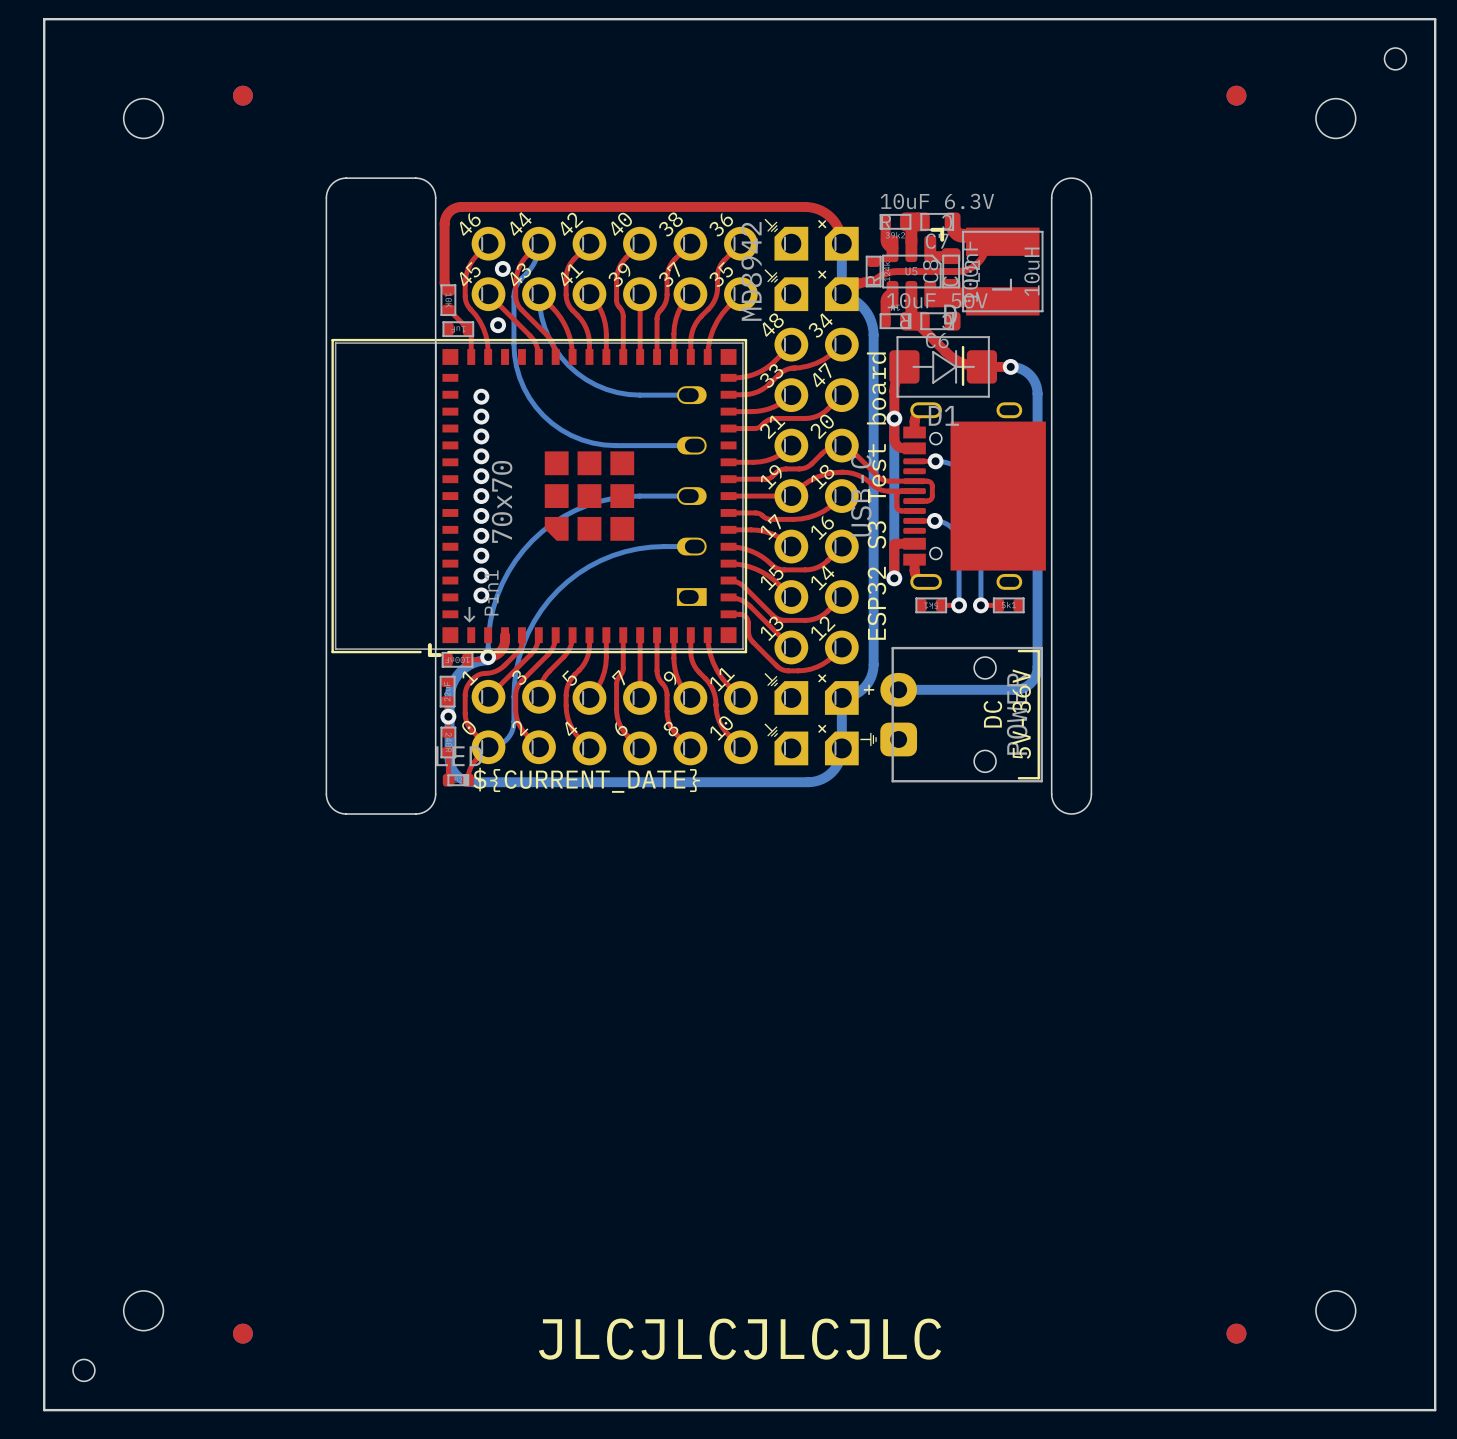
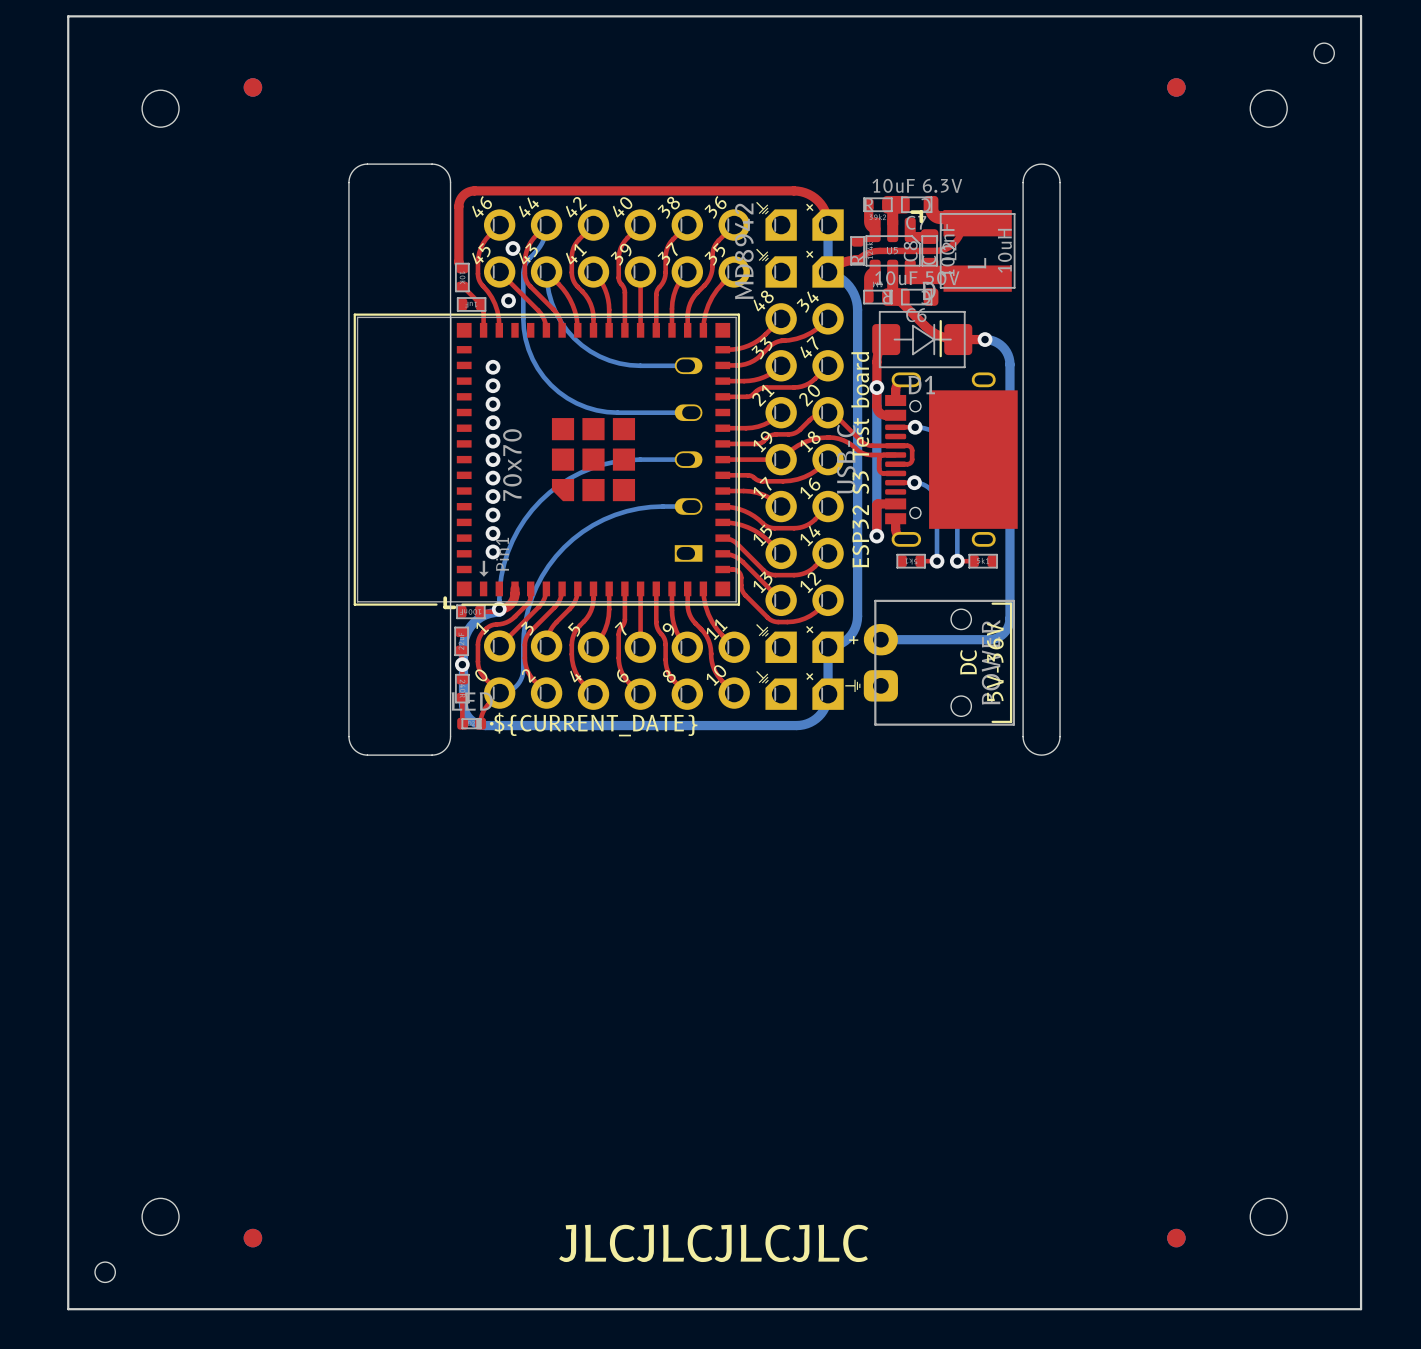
part position: (739, 714) -> (714, 662)

